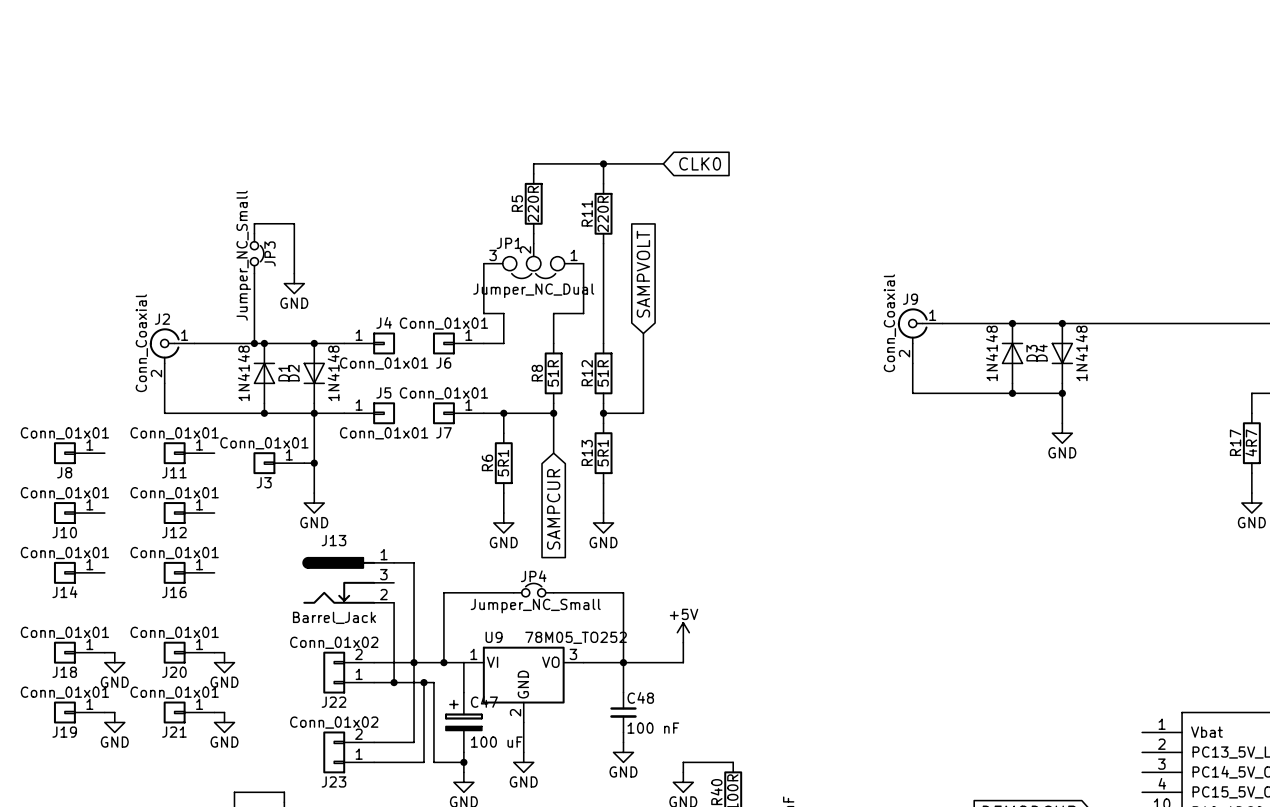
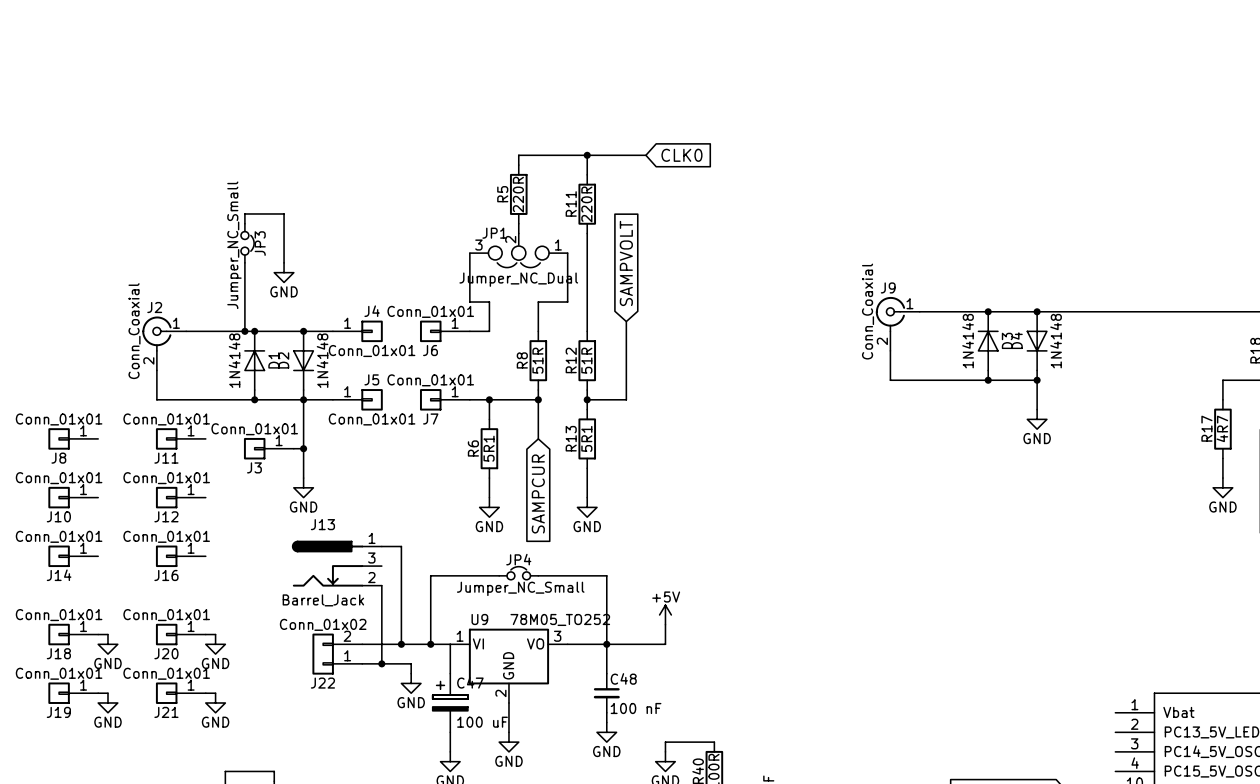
wire: (414, 662) (414, 742) (374, 742) -> none
wire: (423, 682) (433, 682) (433, 762) (463, 762) -> none
junction: (423, 682) -> none
wire: (423, 692) (423, 762) (374, 762) -> none
power symbol: none -> GND (411, 683)
J23: Conn_01x02 (348, 752) -> none
junction: (463, 762) -> none

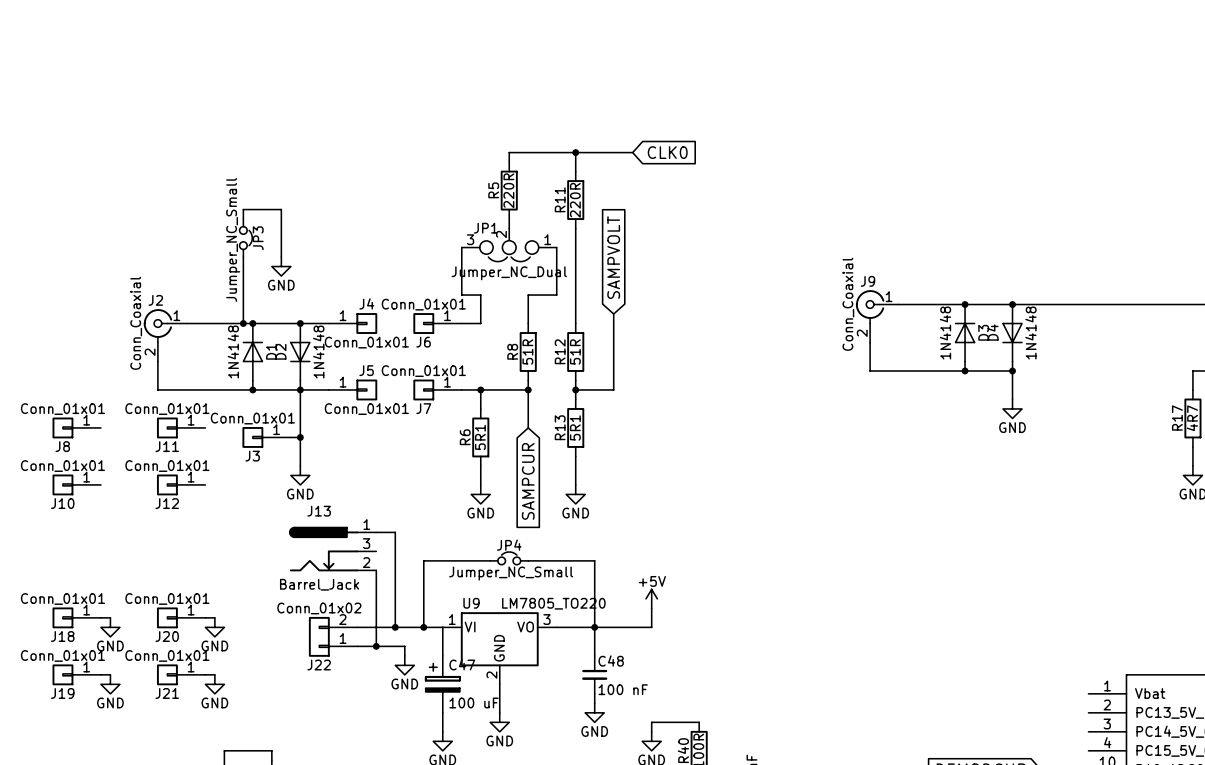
J14: Conn_01x01 (73, 556) -> none
J16: Conn_01x01 (180, 556) -> none
U9 value: 78M05_TO252 (560, 619) -> LM7805_TO220 (553, 603)

